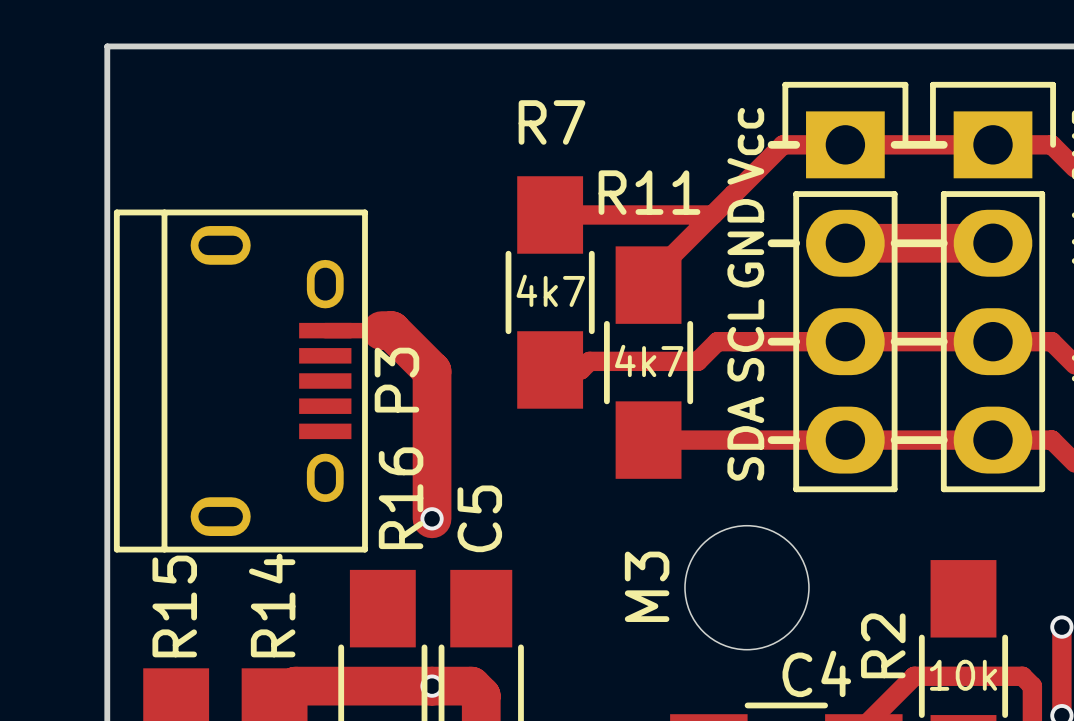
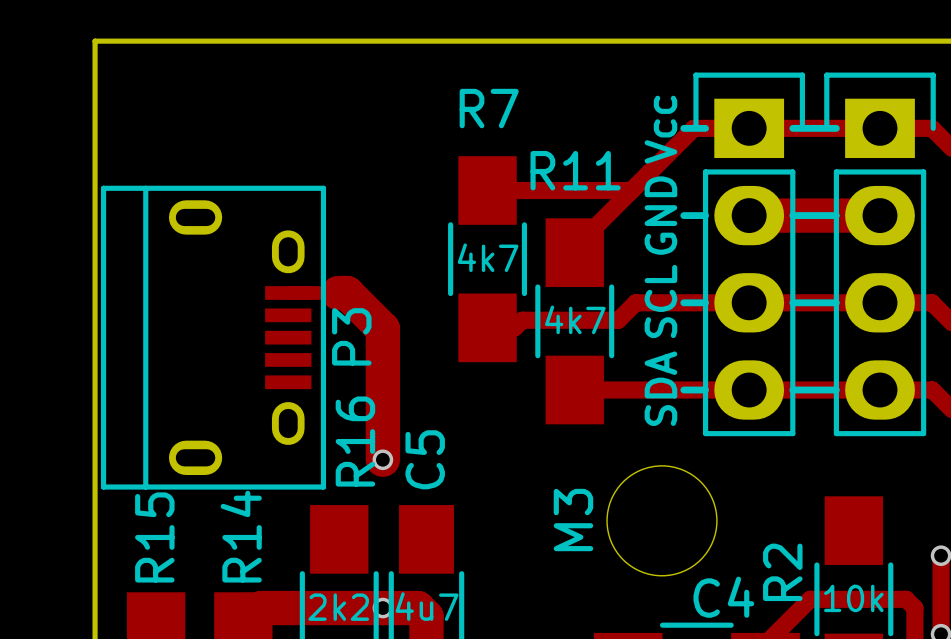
C5 value: none -> 4u7 (427, 606)
R16 value: none -> 2k2 (338, 607)

